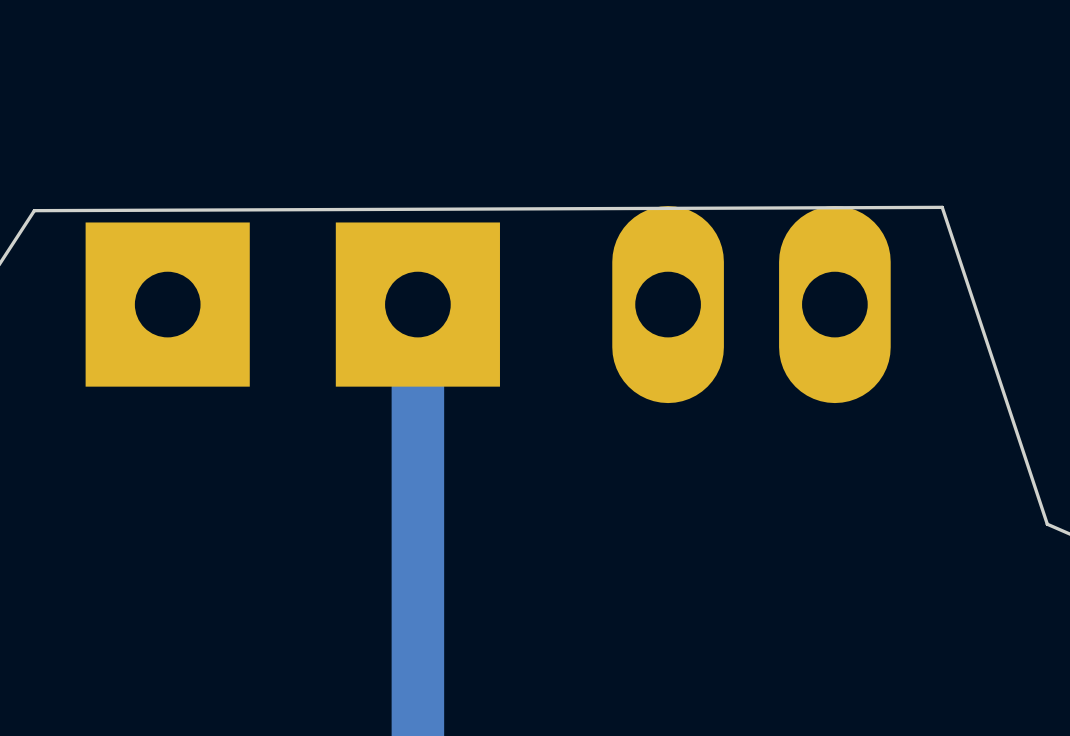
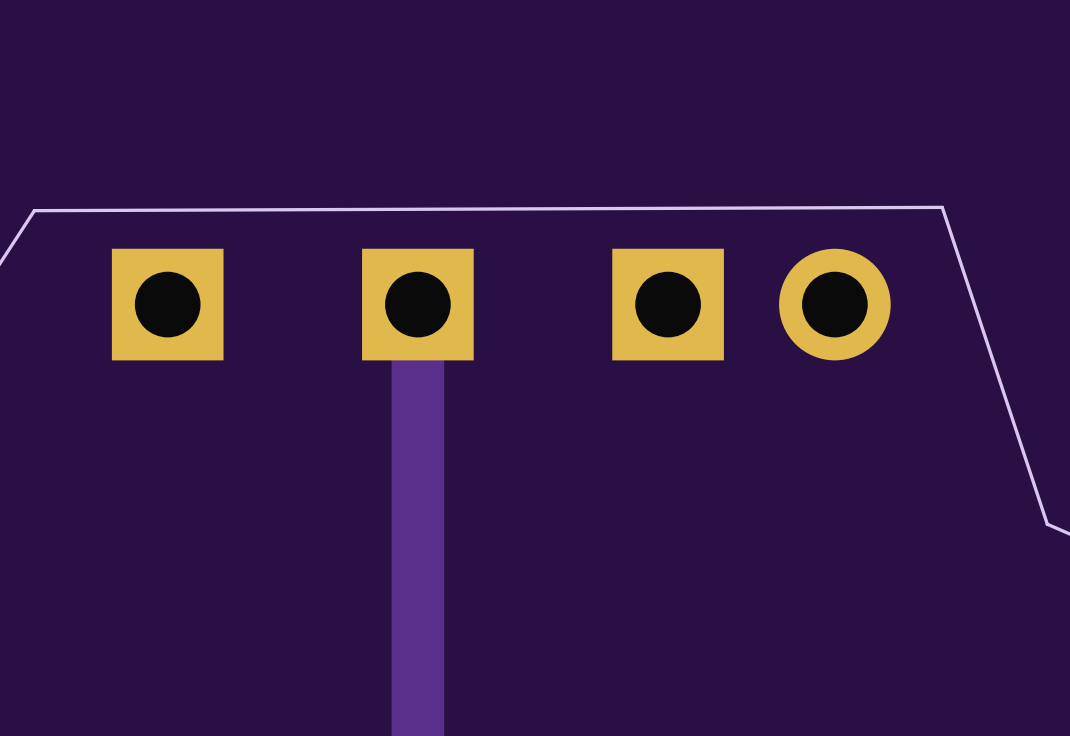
part footprint: [612, 206, 891, 404] -> [612, 248, 891, 361]
part footprint: [85, 222, 250, 387] -> [111, 248, 224, 361]
part footprint: [335, 222, 500, 387] -> [362, 248, 474, 361]

